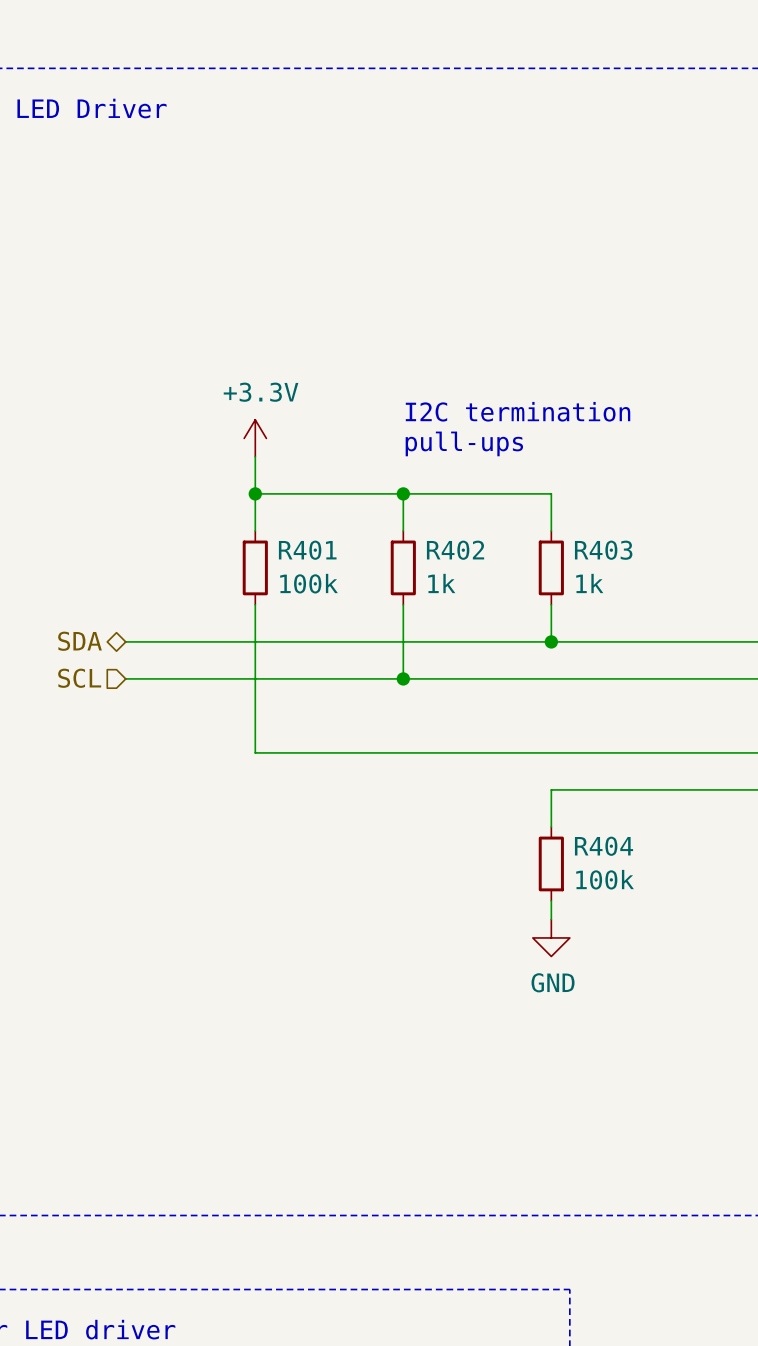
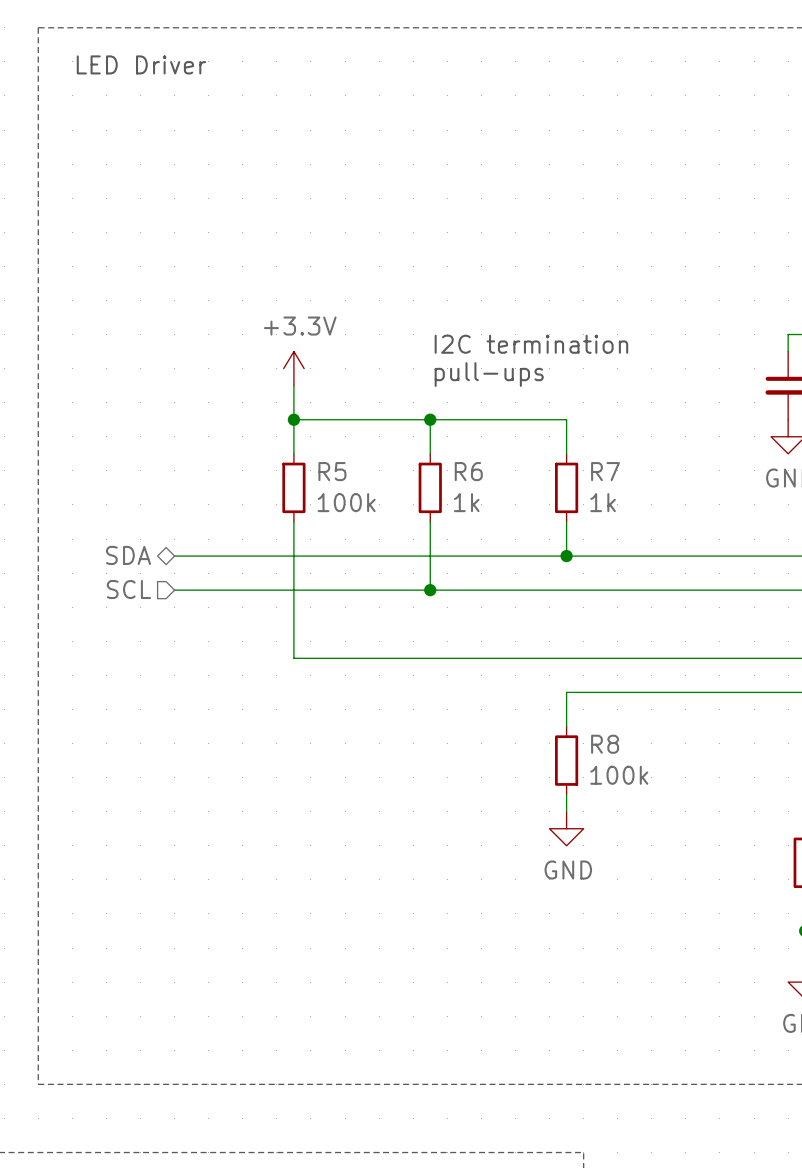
R401 name: R401 (307, 550) -> R5 (332, 471)
R402 name: R402 (455, 550) -> R6 (468, 471)
R403 name: R403 (603, 550) -> R7 (605, 471)
R404 name: R404 (604, 846) -> R8 (605, 744)

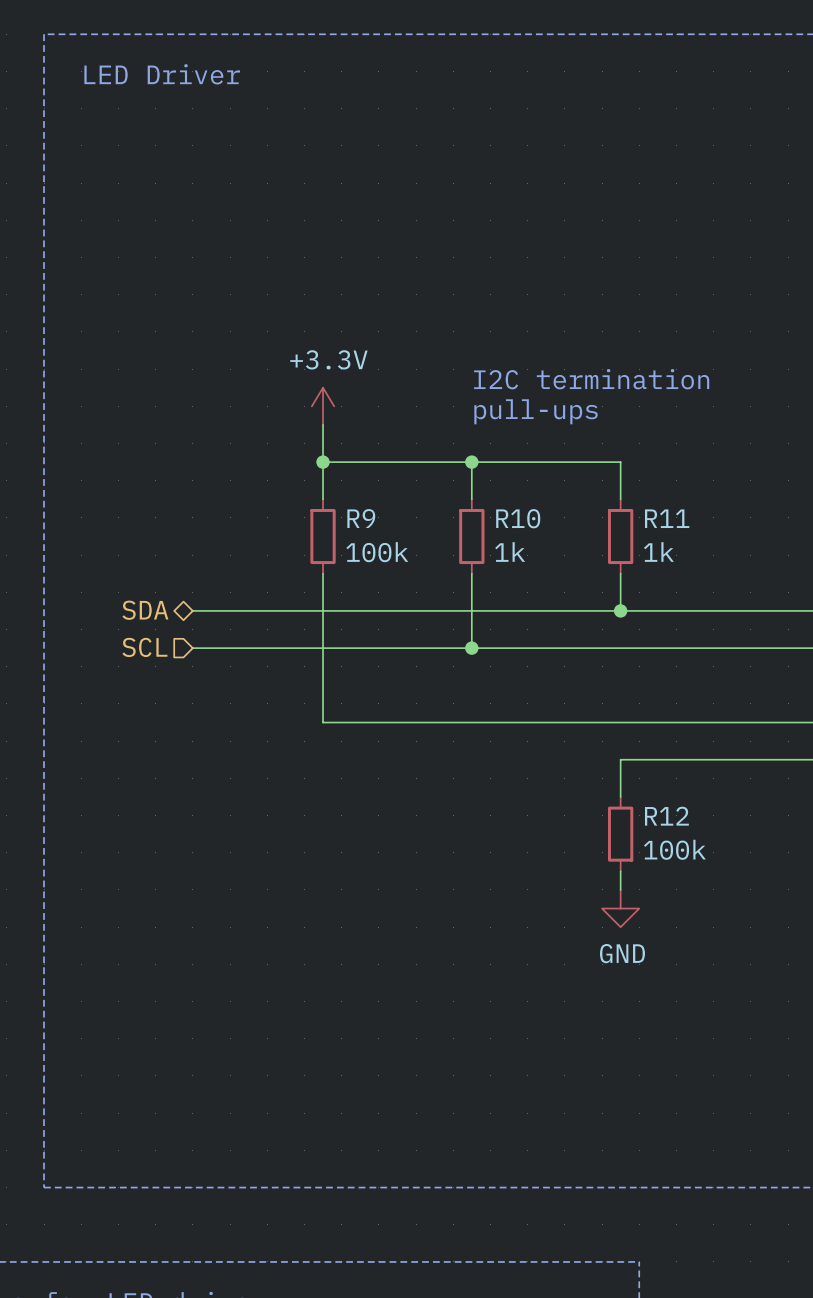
R5 name: R5 (332, 471) -> R9 (361, 518)
R6 name: R6 (468, 471) -> R10 (518, 518)
R7 name: R7 (605, 471) -> R11 (667, 518)
R8 name: R8 (605, 744) -> R12 (666, 816)

